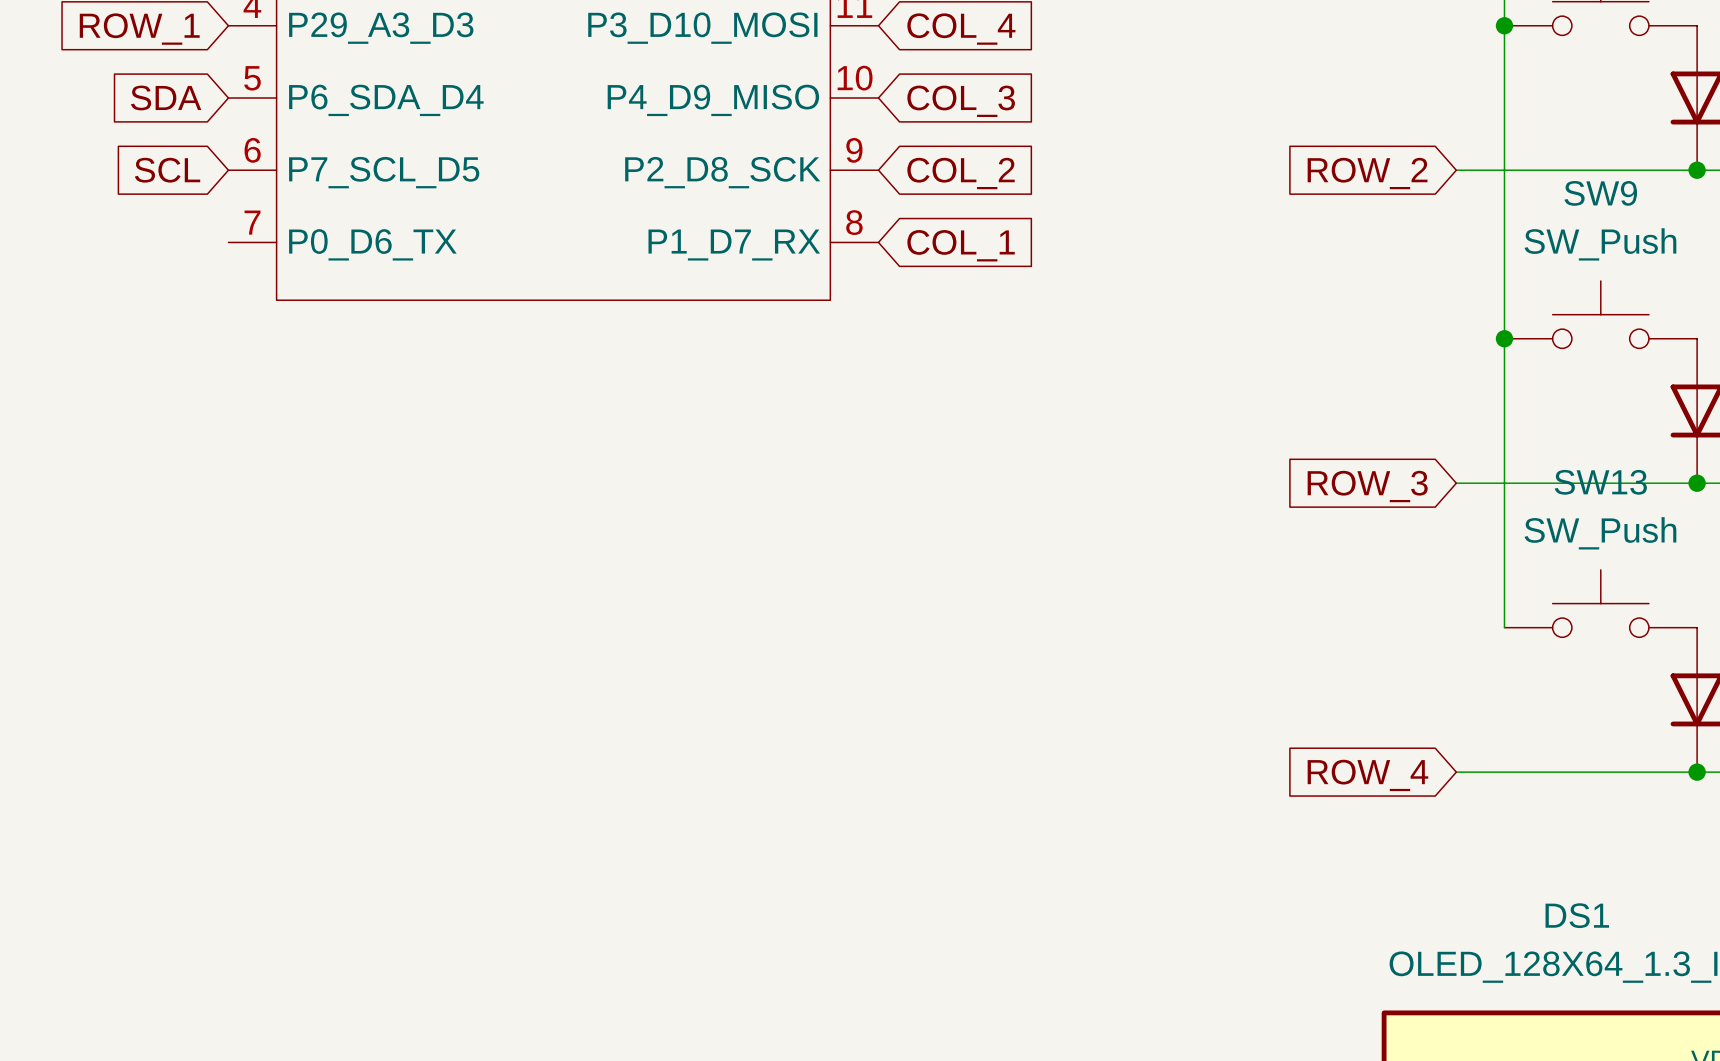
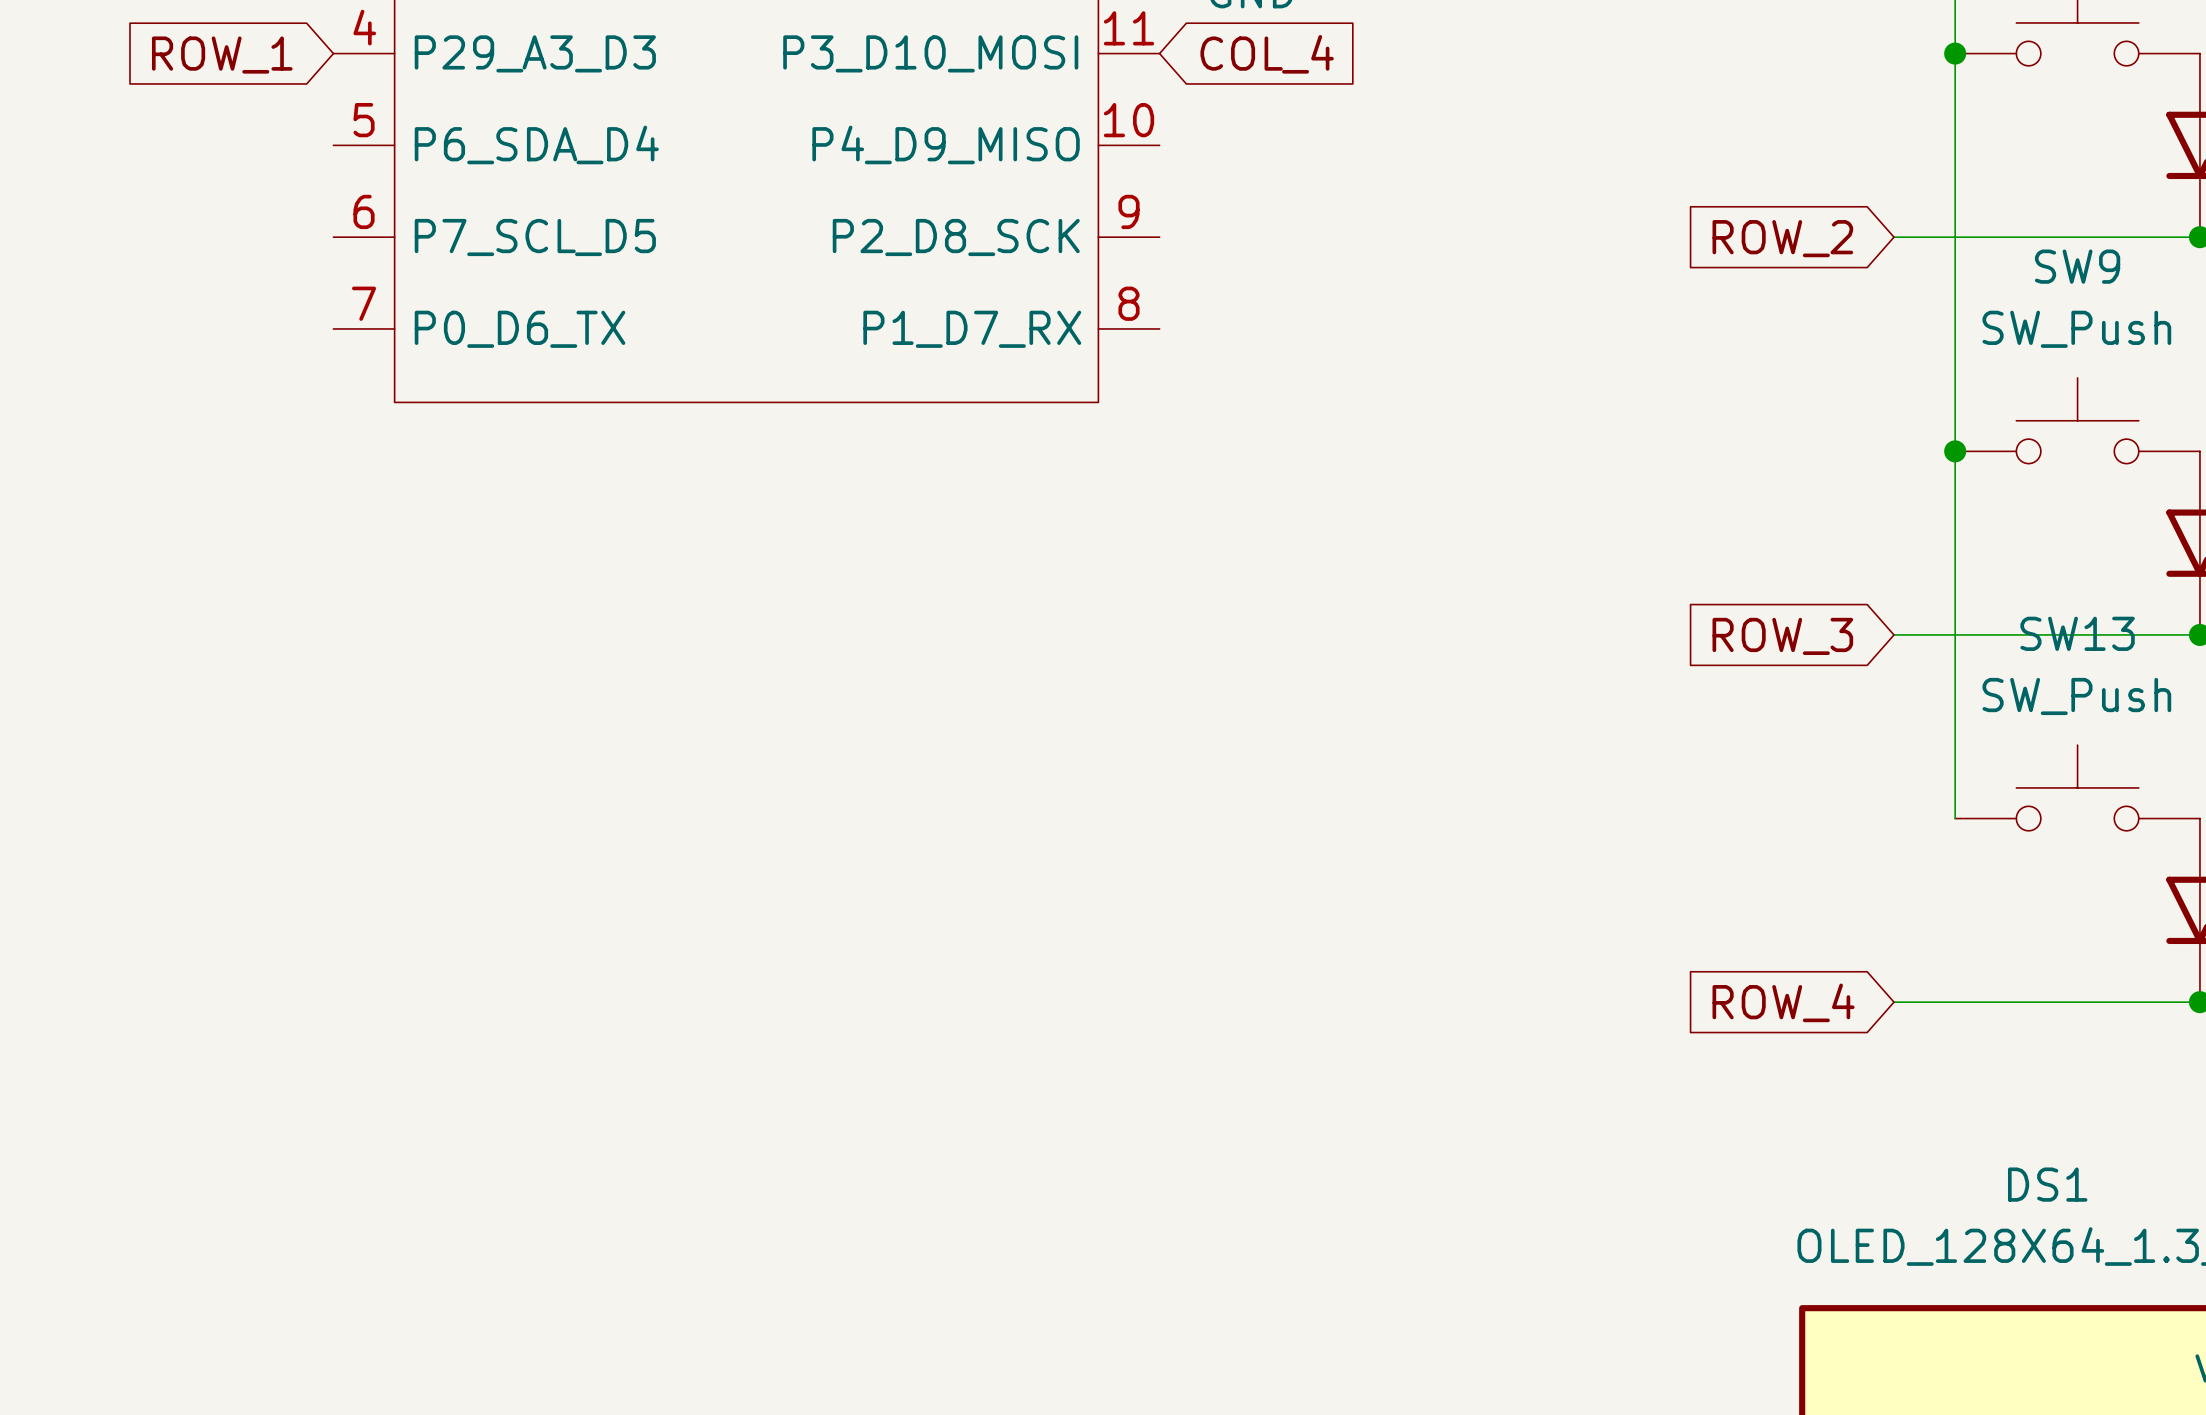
global label: SDA (166, 97) -> none
global label: COL_3 (961, 101) -> none
global label: SCL (167, 170) -> none
global label: COL_2 (961, 173) -> none
global label: COL_1 (961, 245) -> none

